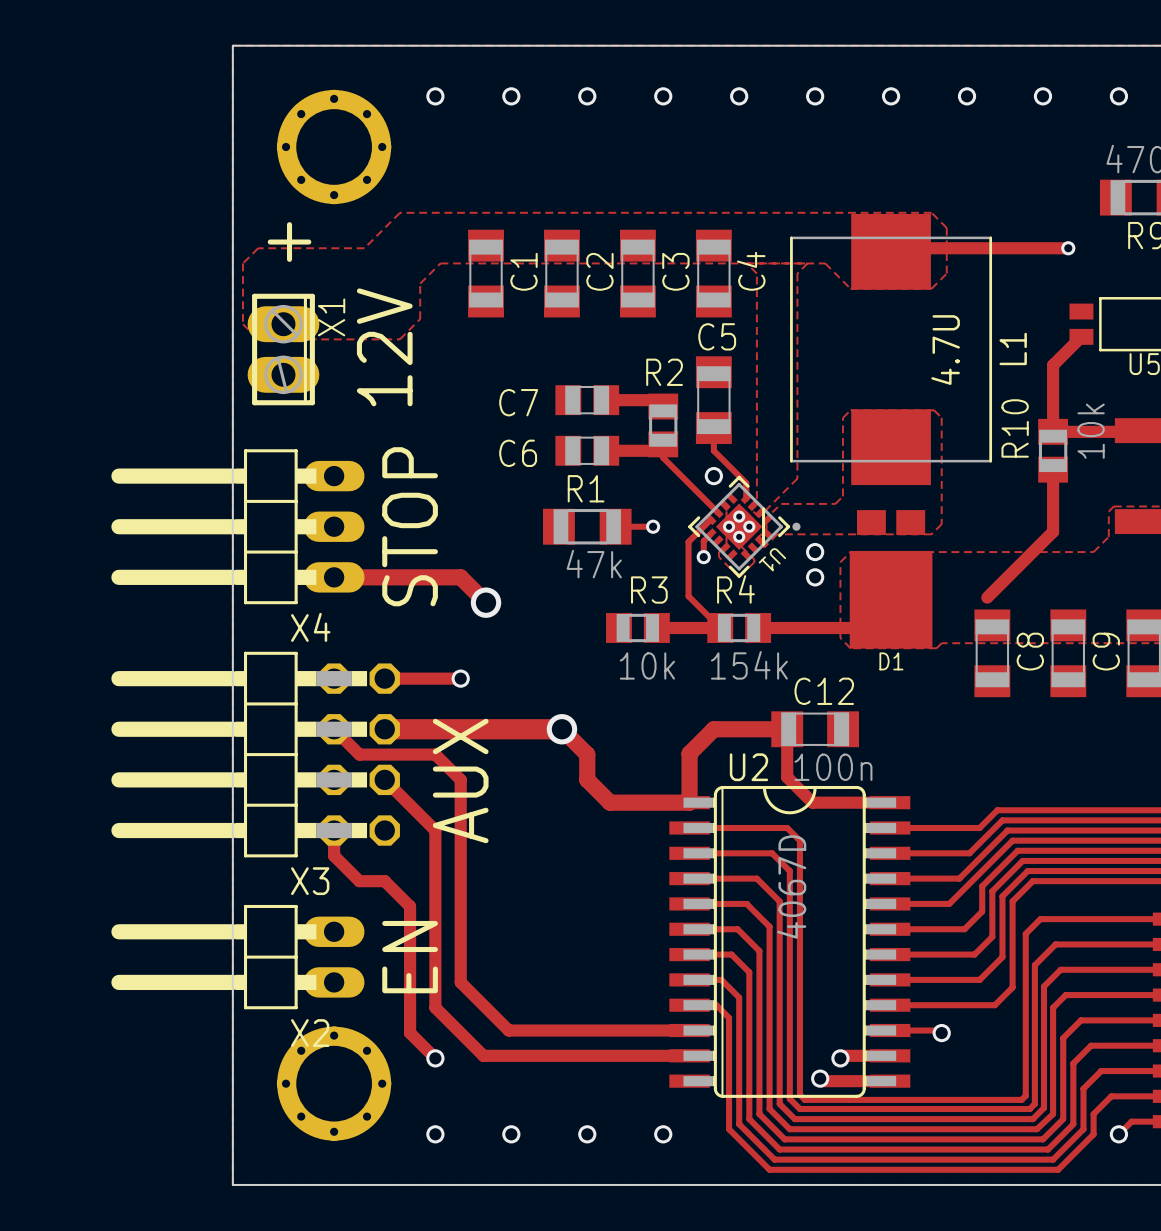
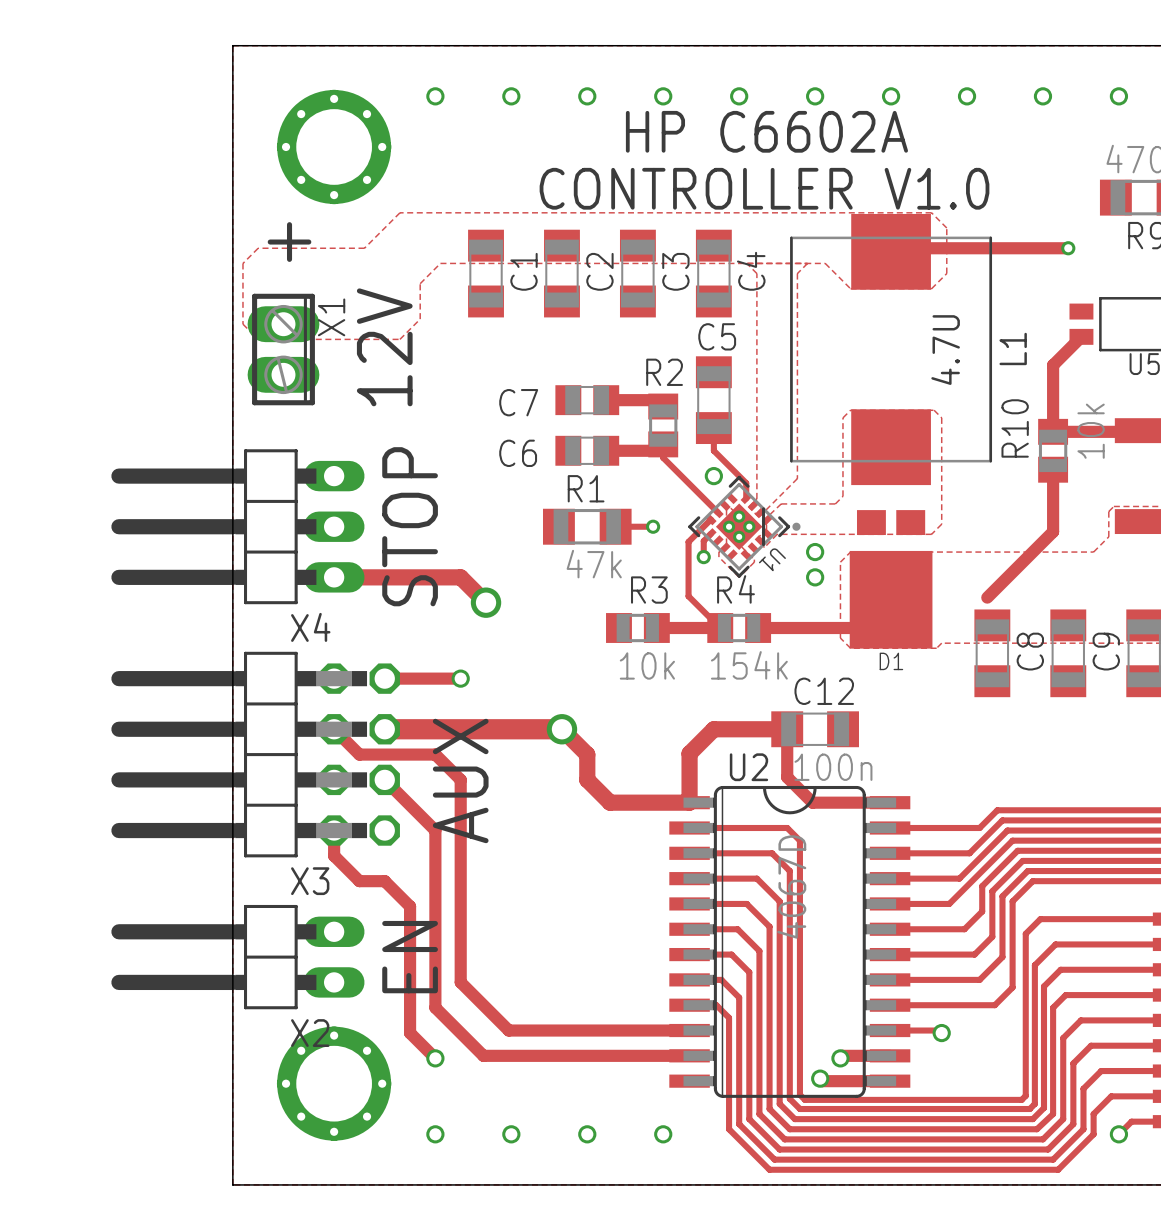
text: none -> HP C6602A (766, 131)
text: none -> CONTROLLER V1.0 (764, 188)

